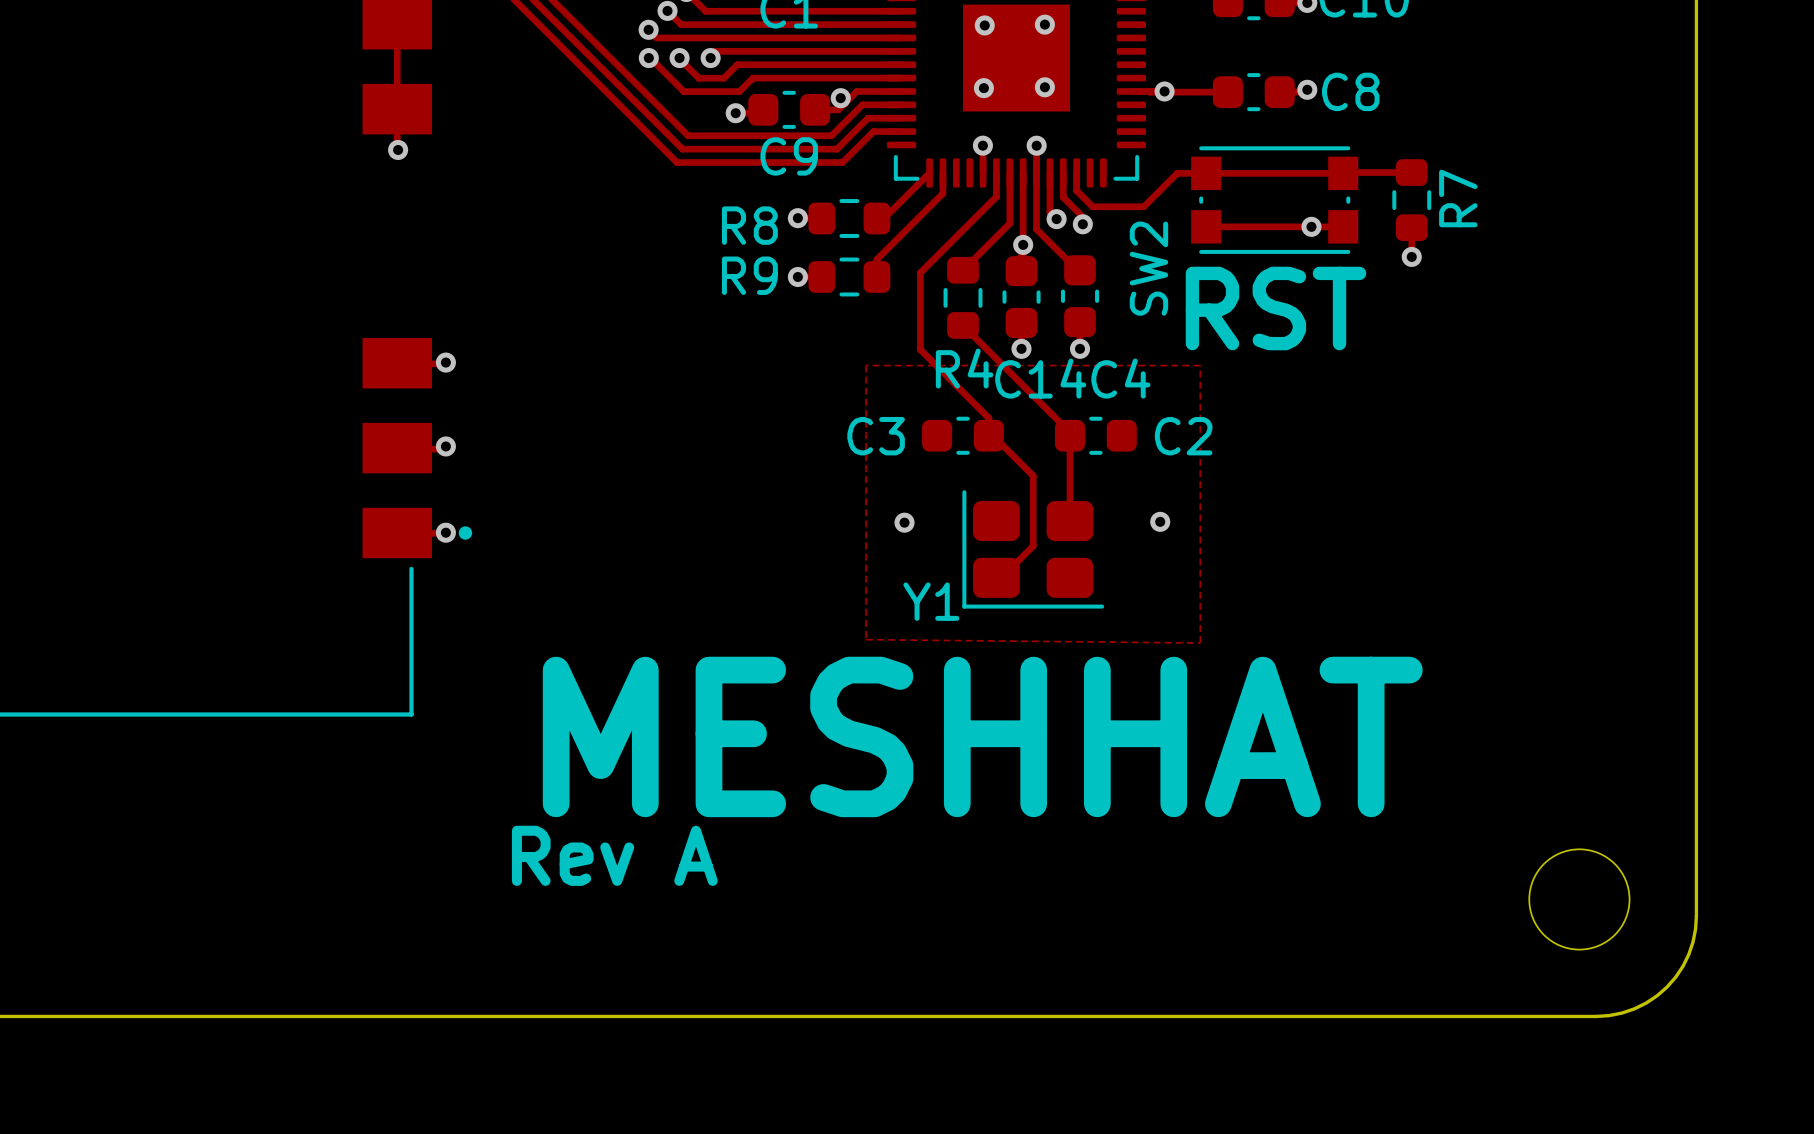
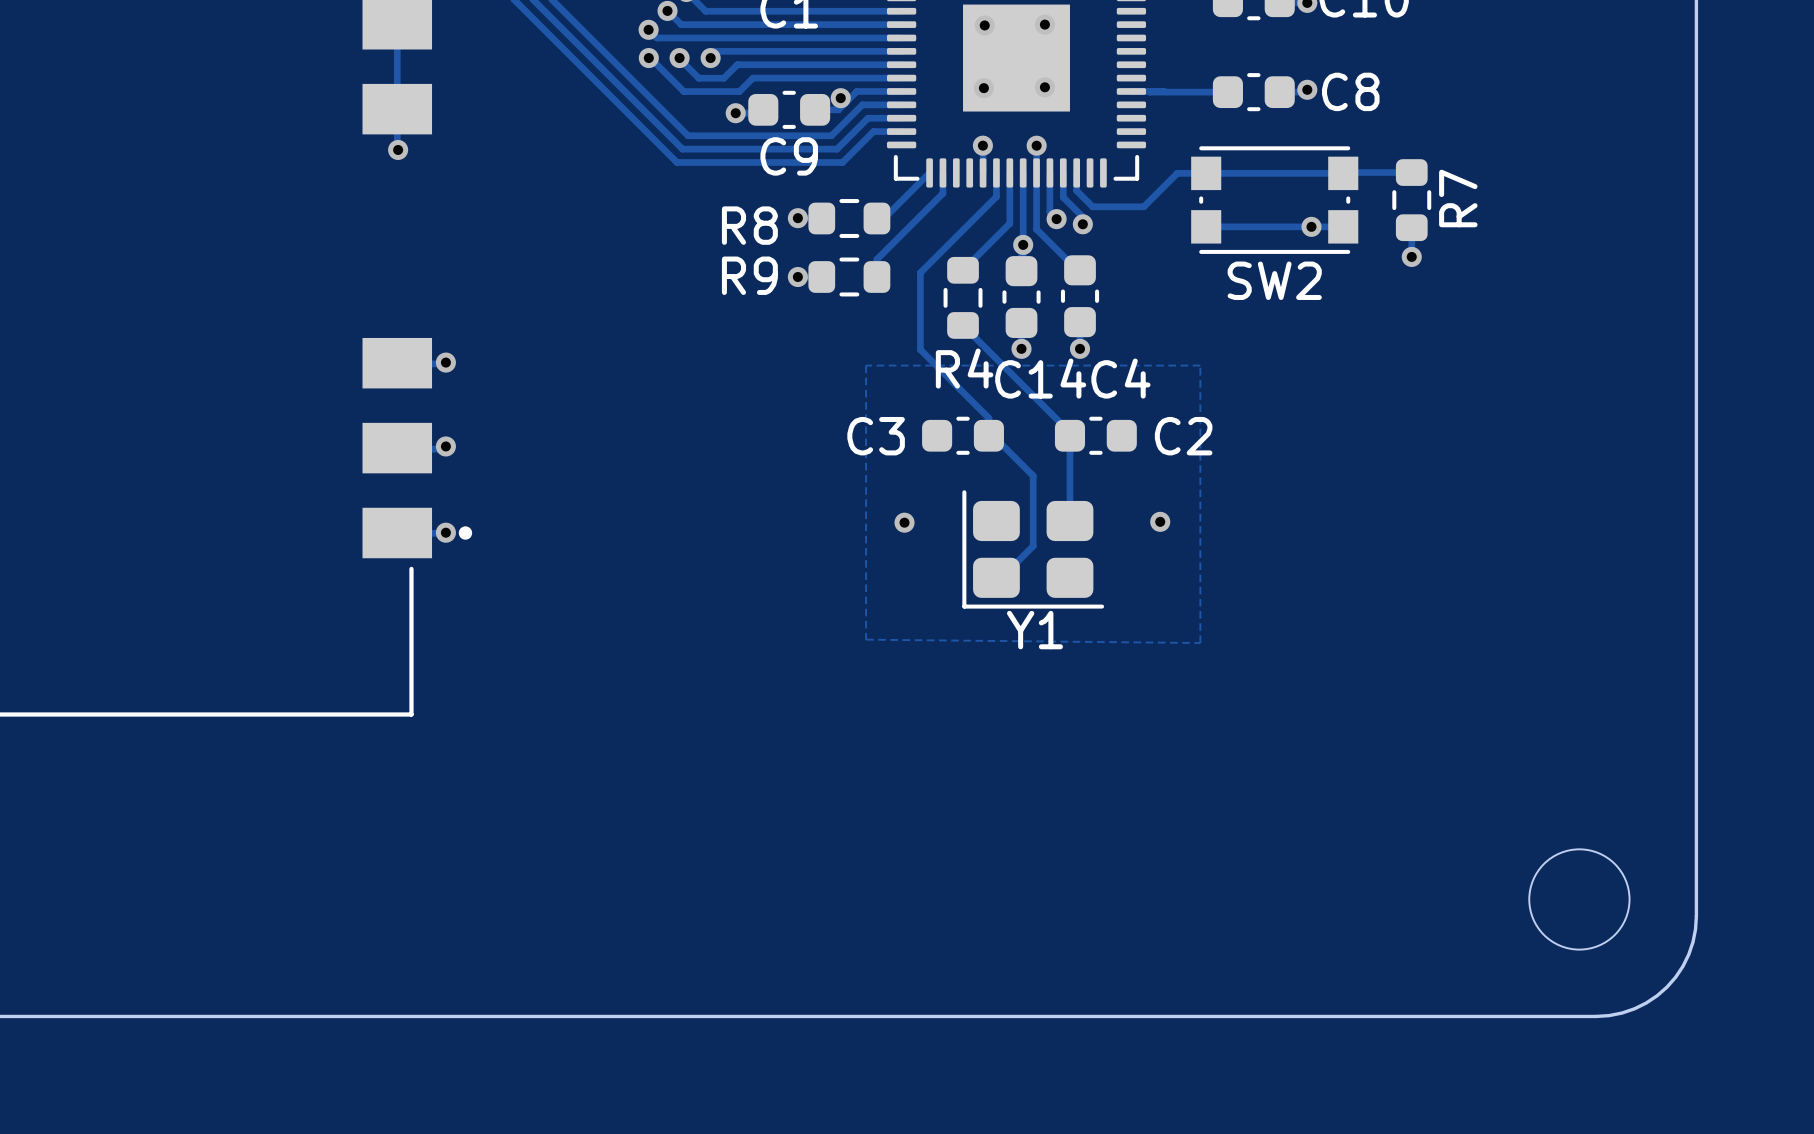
via: (1164, 91) -> none
SW2 name rotation: 0° (1148, 268) -> 90° clockwise (1274, 280)
text: RST (1276, 308) -> none
Y1 name position: Y1 (931, 601) -> Y1 (1034, 630)
text: MESHHAT (982, 736) -> none
text: Rev A (614, 855) -> none

